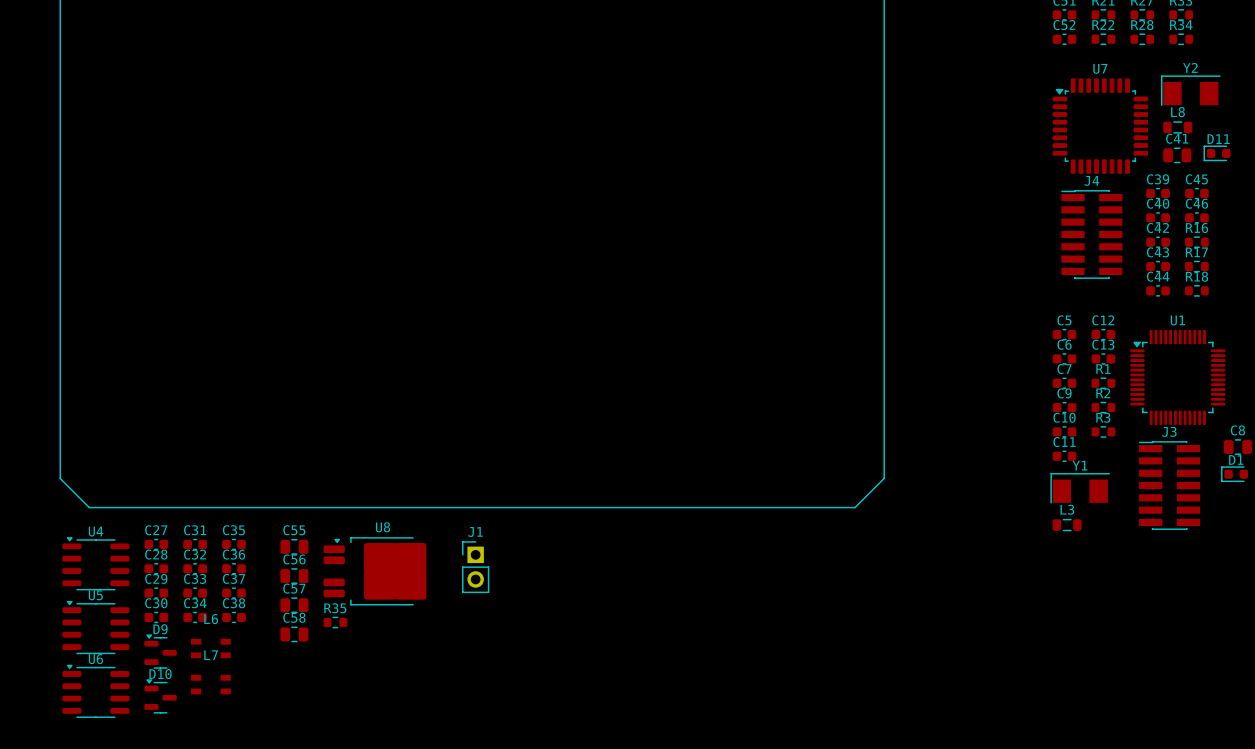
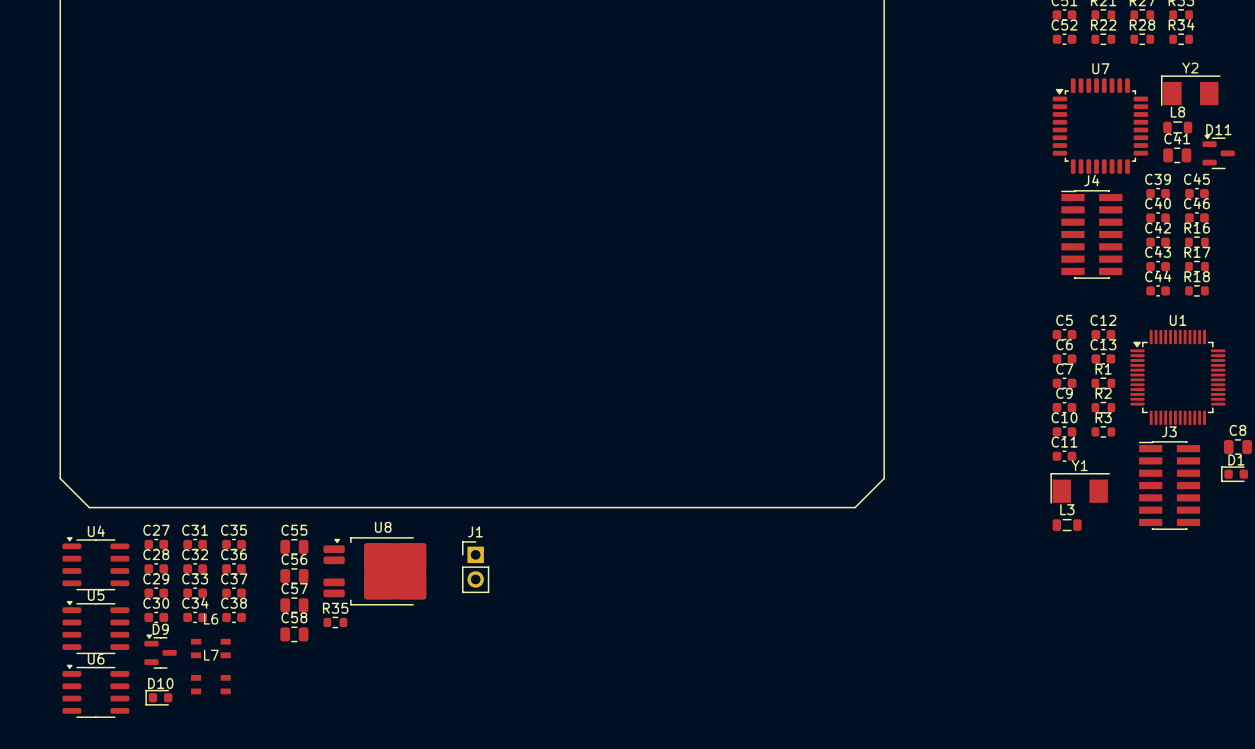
D11 footprint: [1203, 145, 1231, 162] -> [1202, 134, 1235, 170]
D10 footprint: [144, 679, 177, 714] -> [145, 690, 173, 706]

